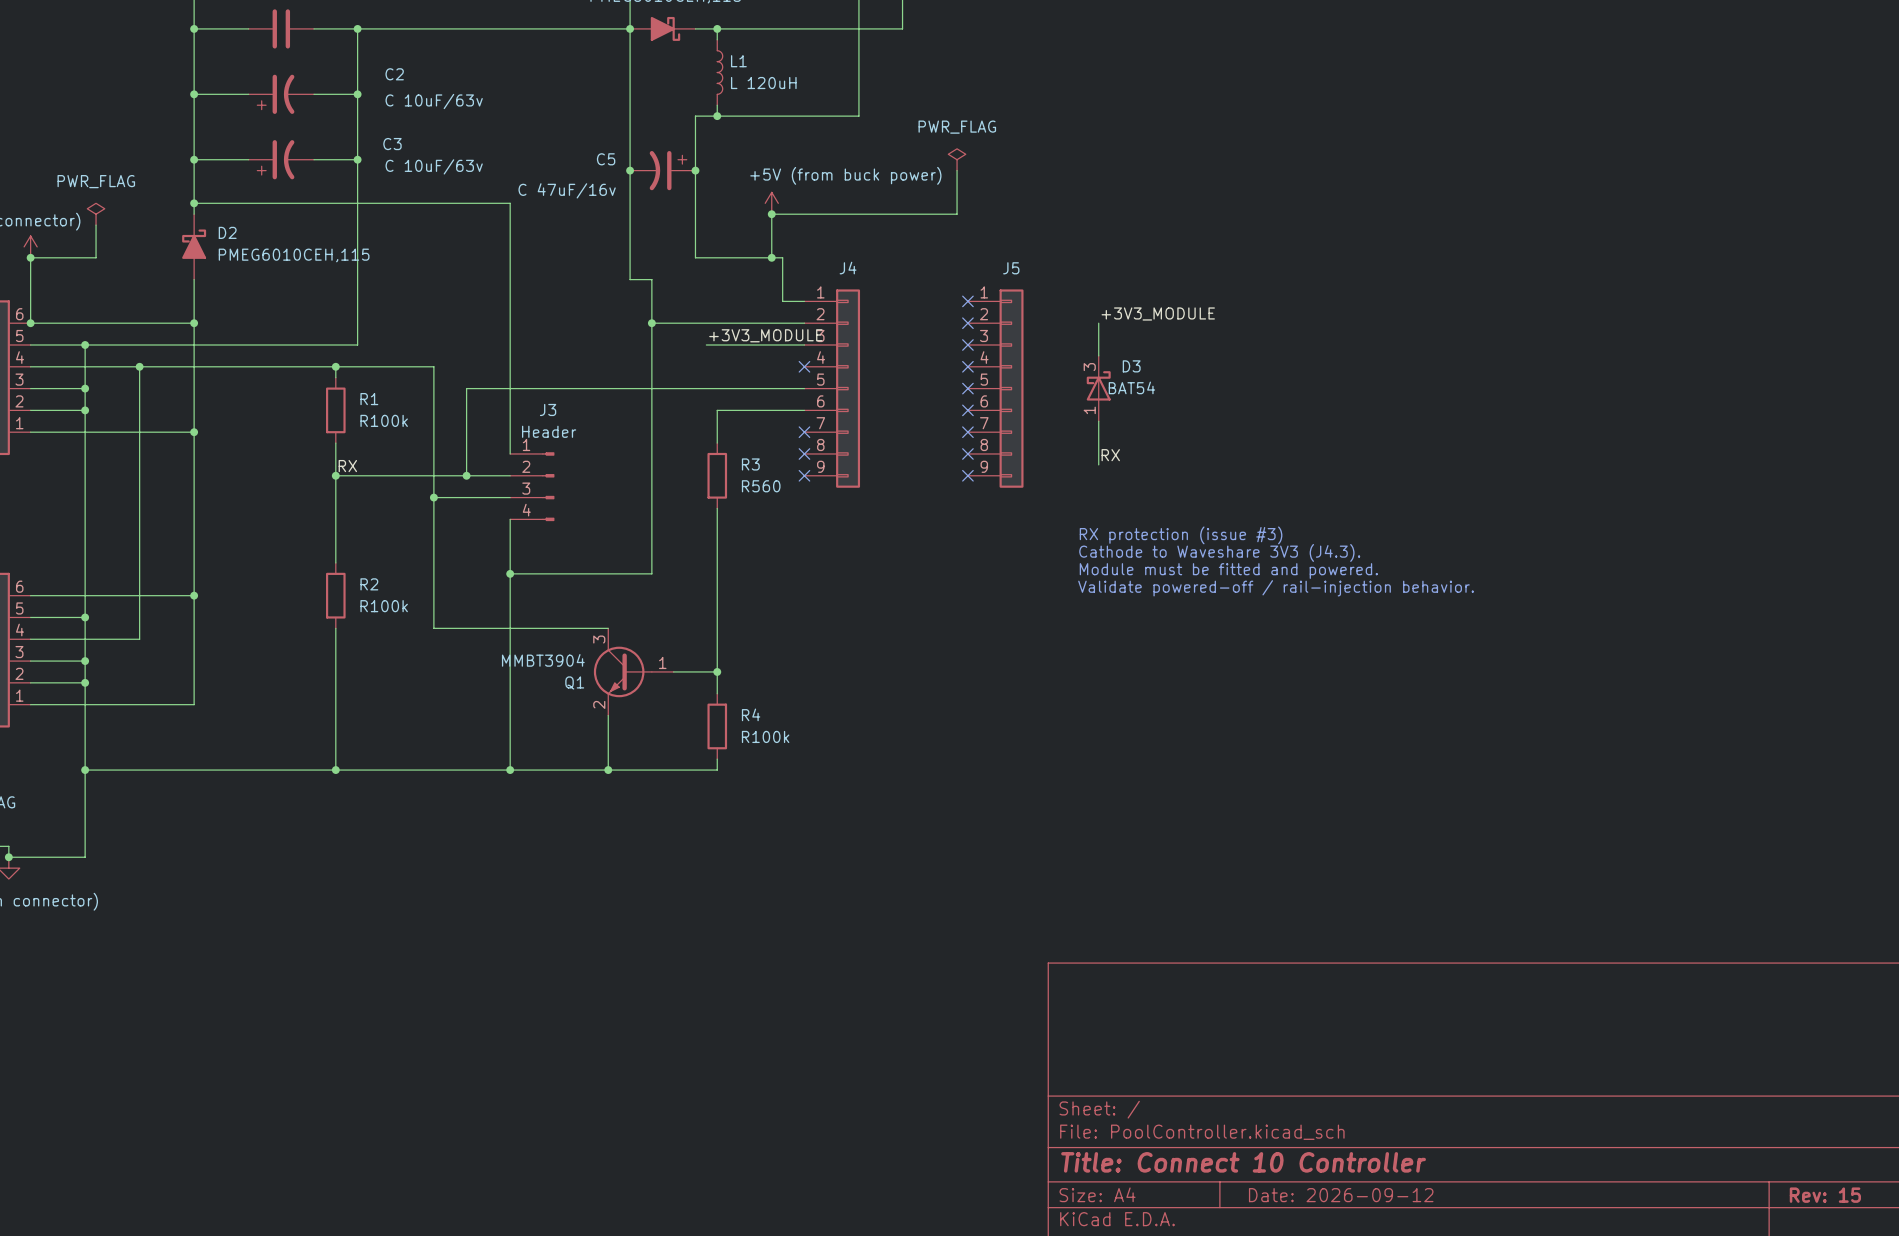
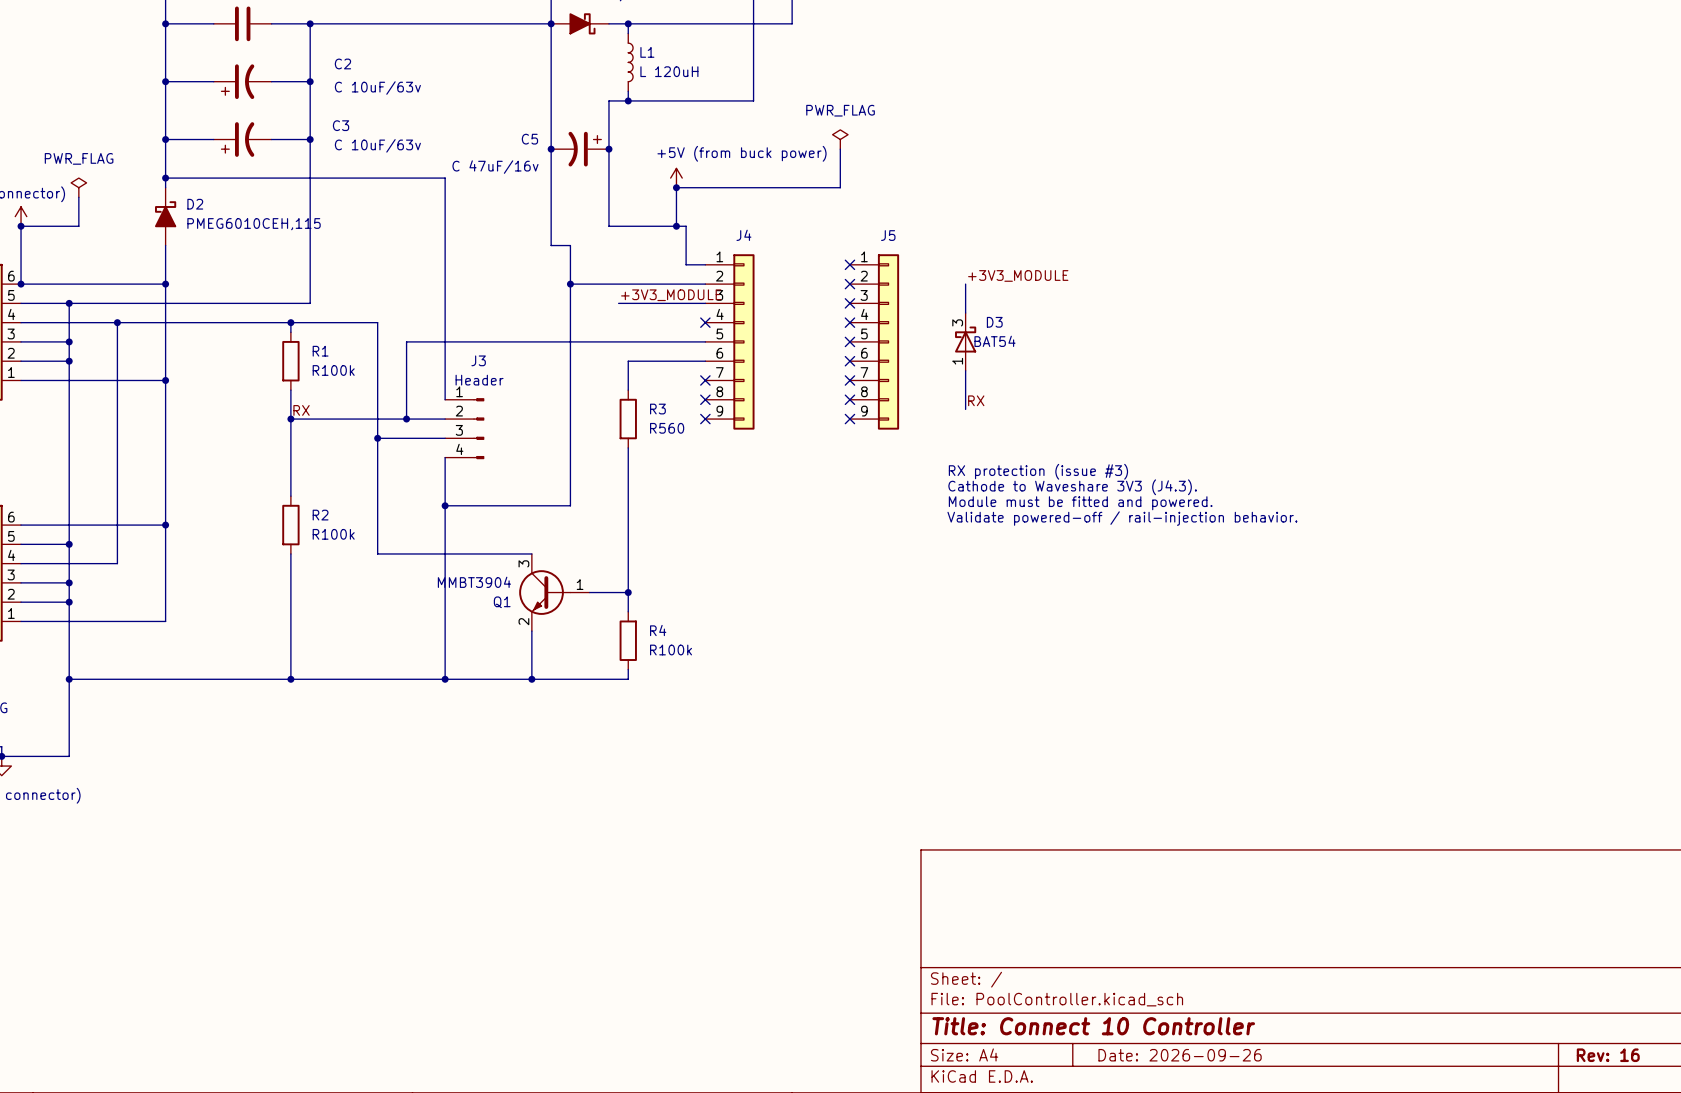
title block: Date: 2026-09-12 (1341, 1195) -> Date: 2026-09-26 (1180, 1055)
title block: Rev: 15 (1825, 1195) -> Rev: 16 (1608, 1055)

